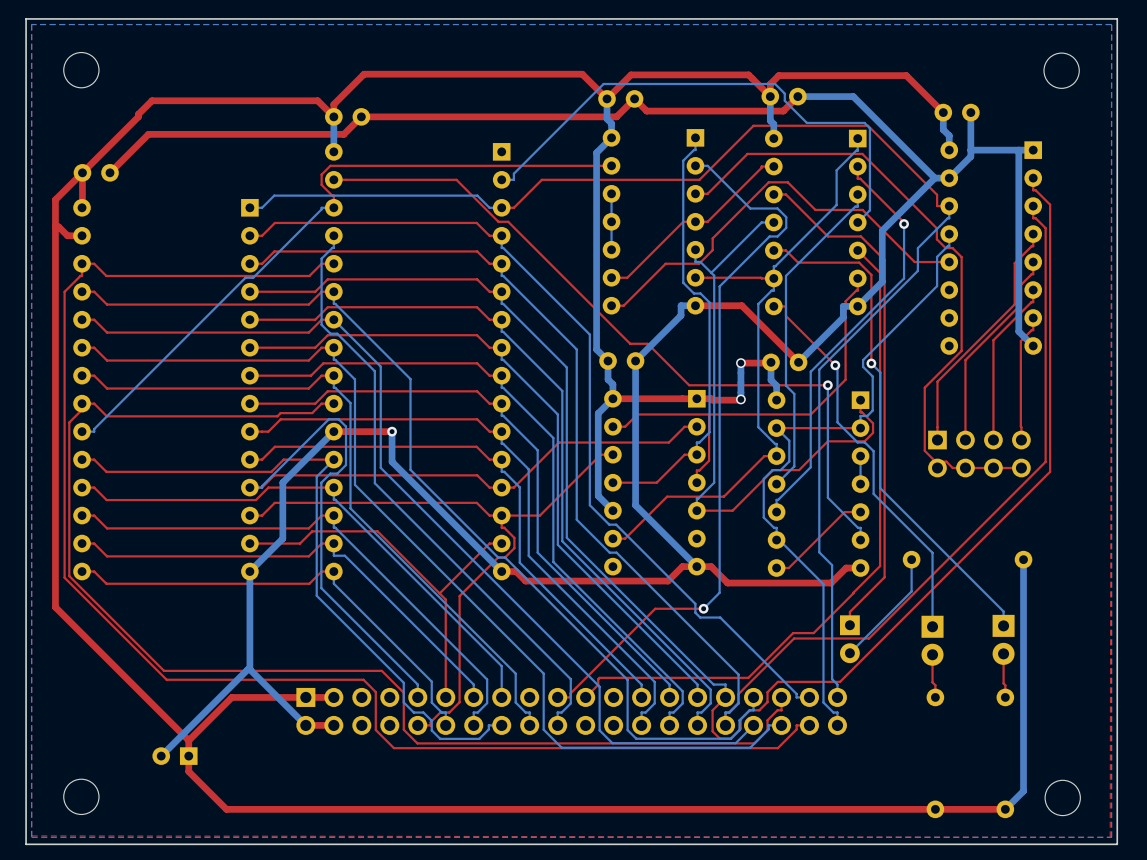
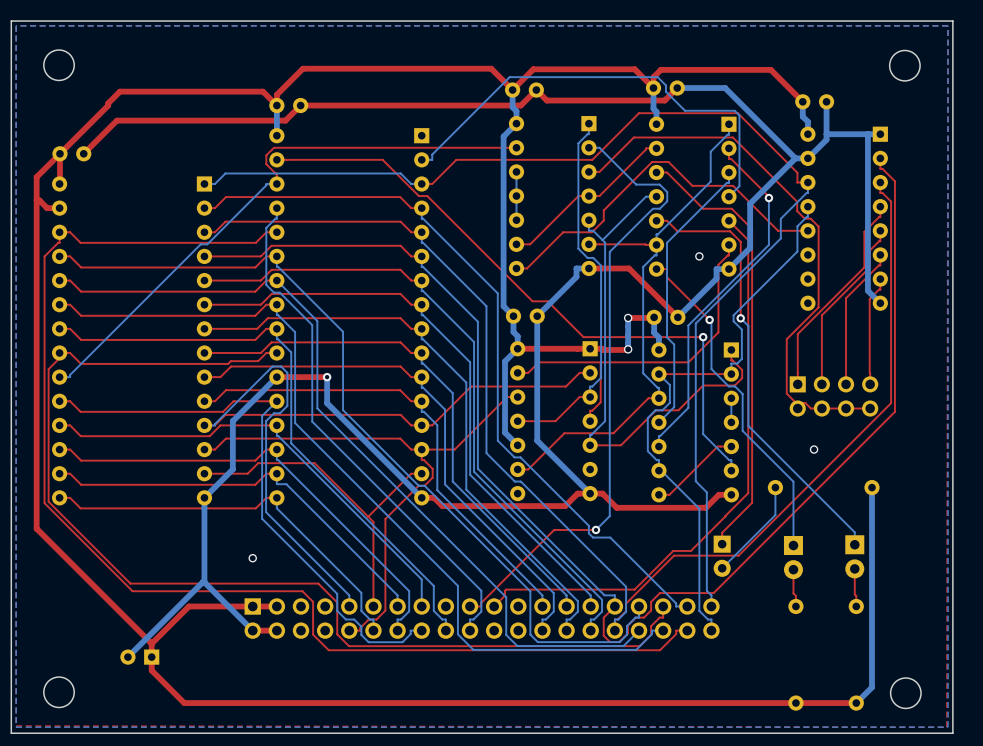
via: none -> (699, 256)
via: none -> (814, 449)
via: none -> (252, 558)

